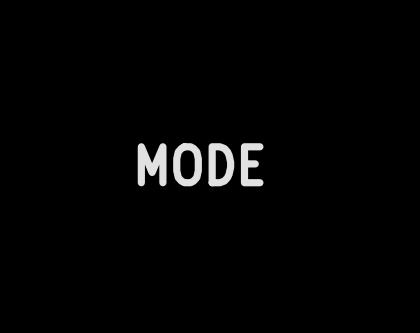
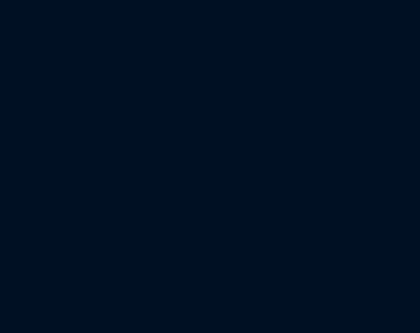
text: MODE (200, 164) -> none

